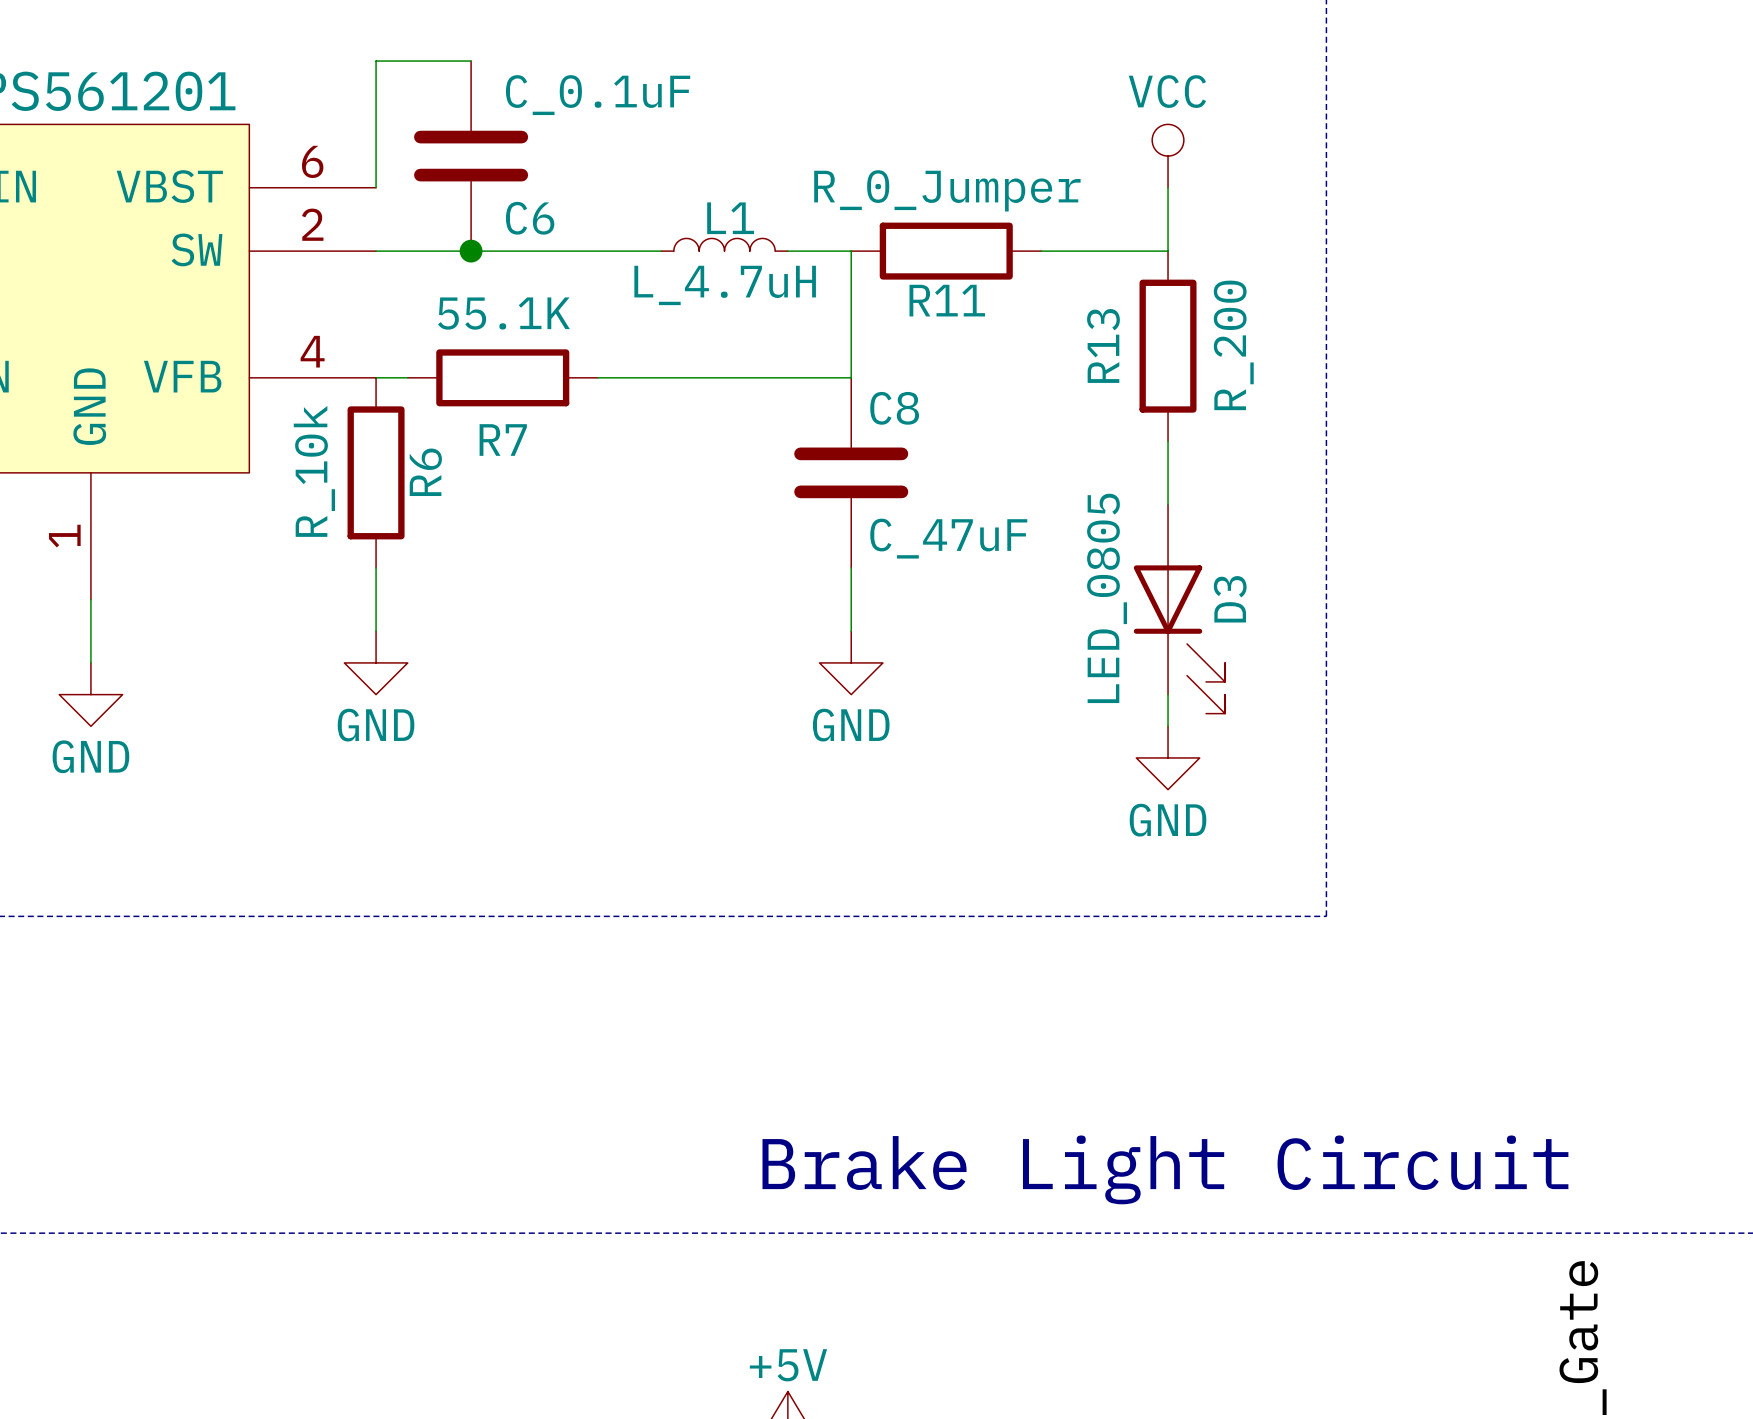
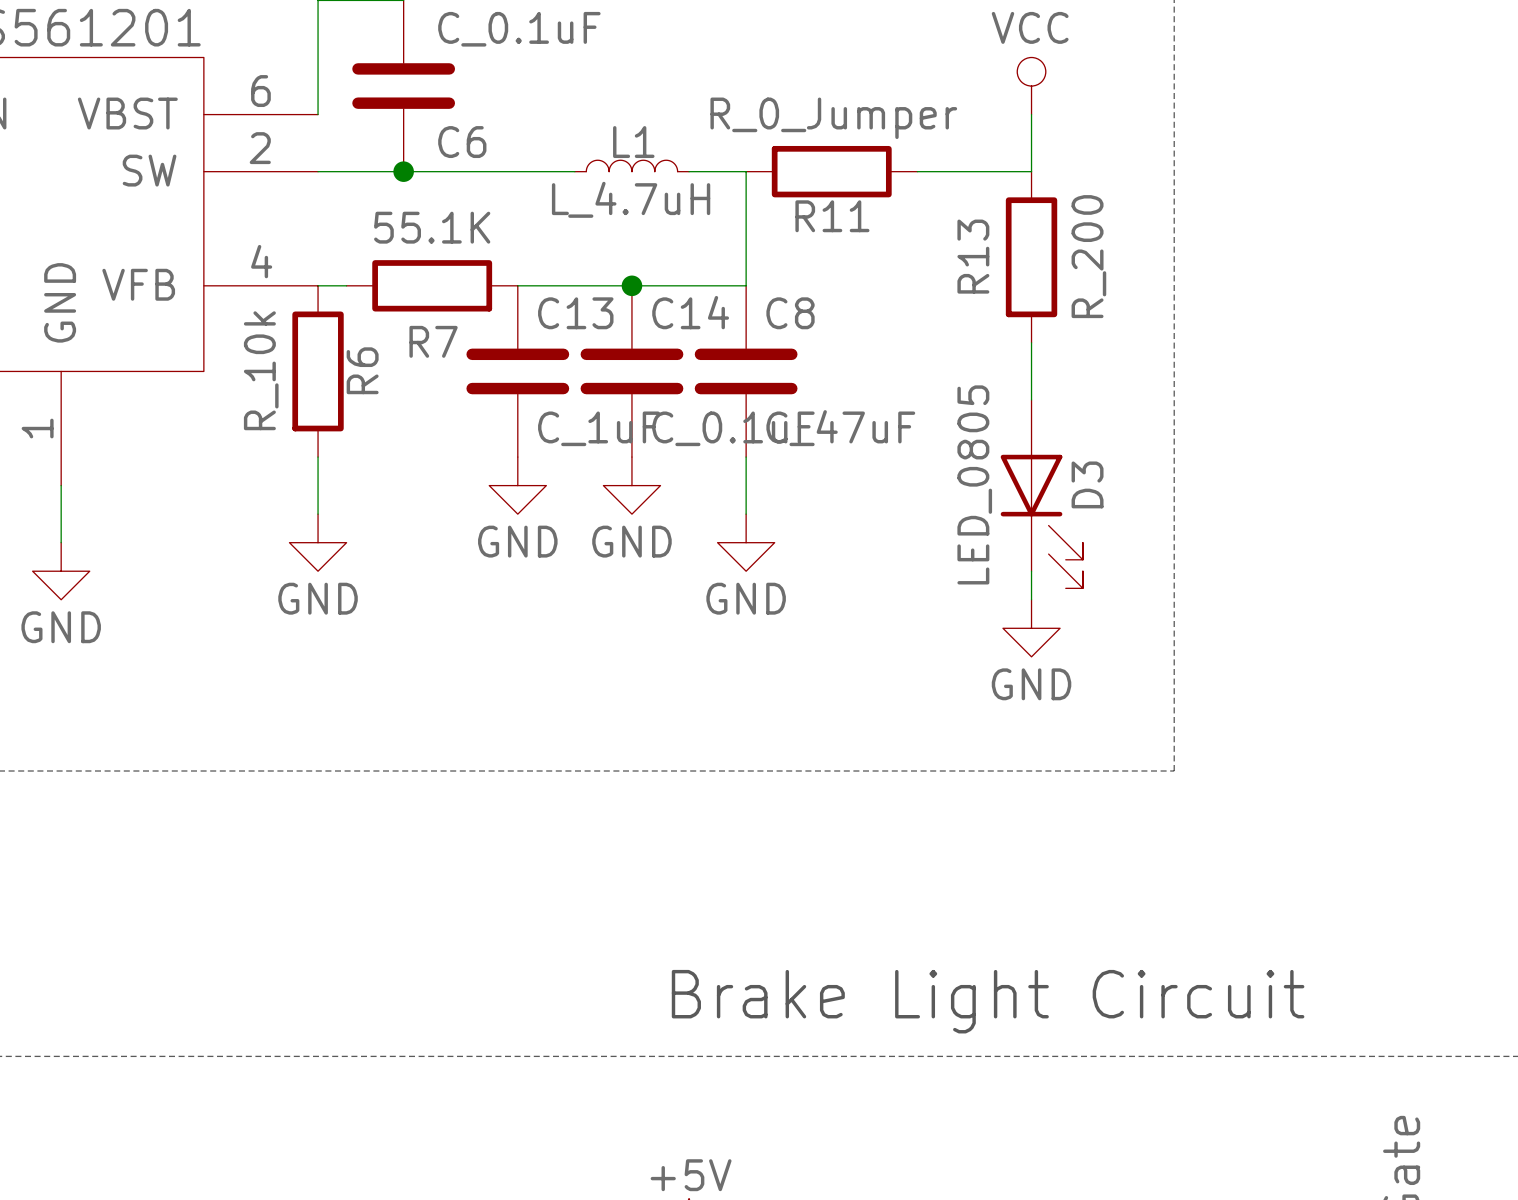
junction: none -> (631, 285)
C13: none -> C_1uF (517, 371)
C14: none -> C_0.1uF (631, 371)
power symbol: none -> GND (517, 485)
power symbol: none -> GND (631, 485)

